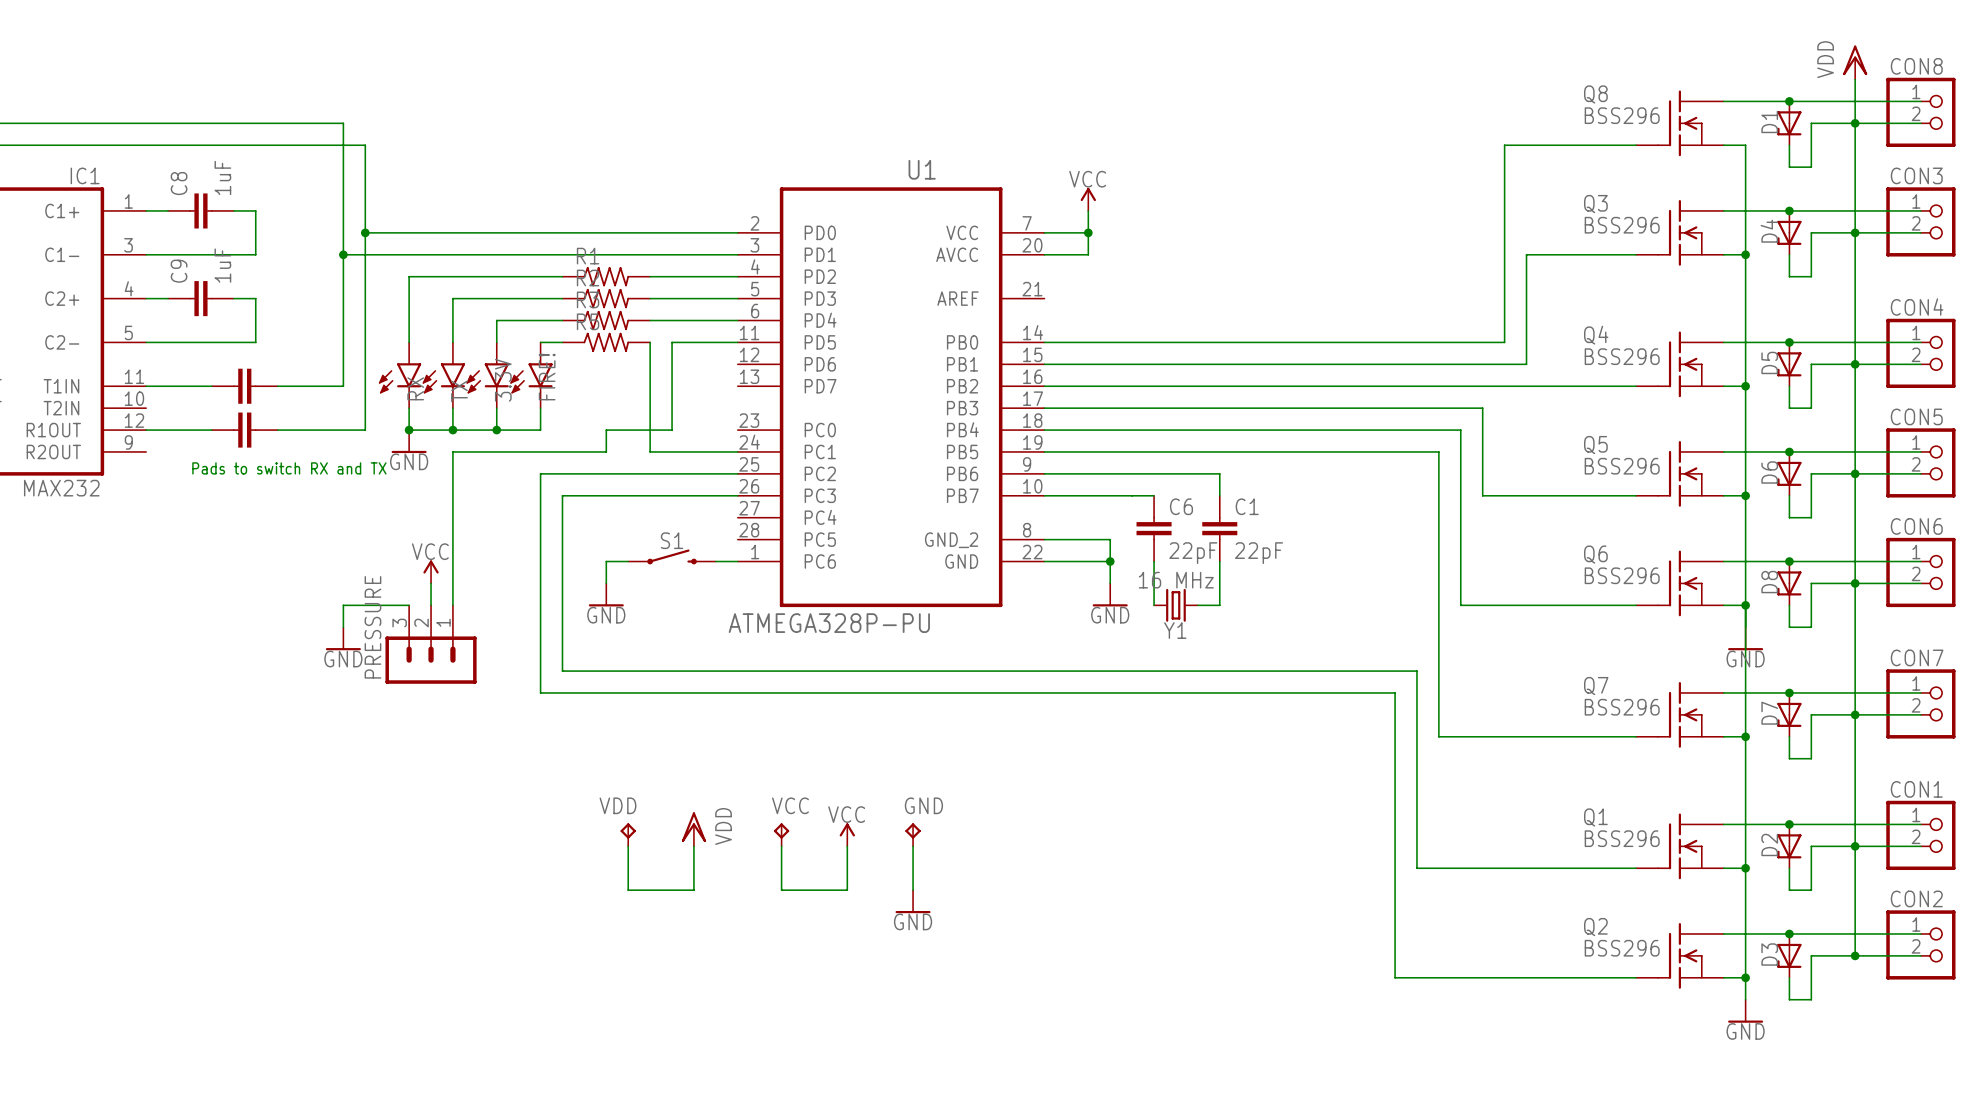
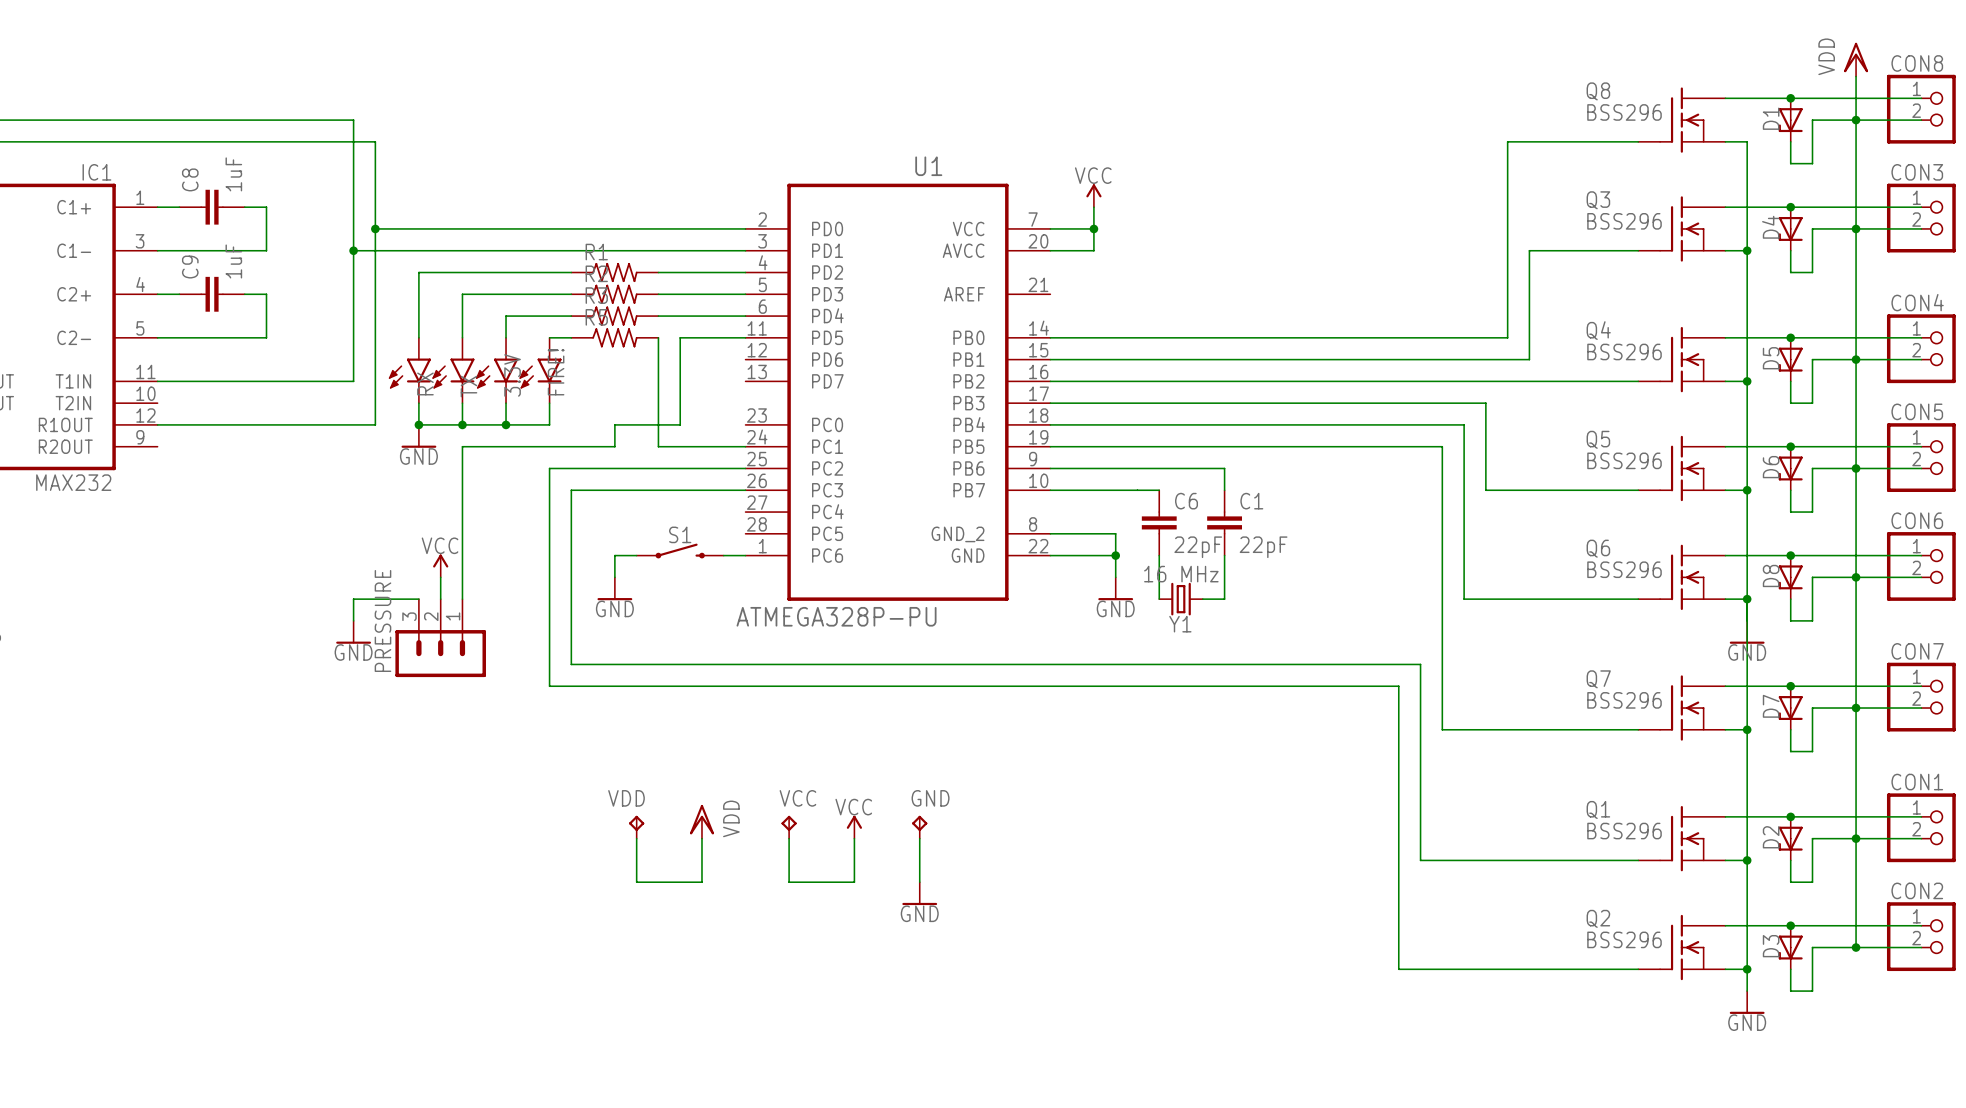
part: (244, 386) -> none
part: (244, 430) -> none
text: Pads to switch RX and TX (289, 468) -> none

